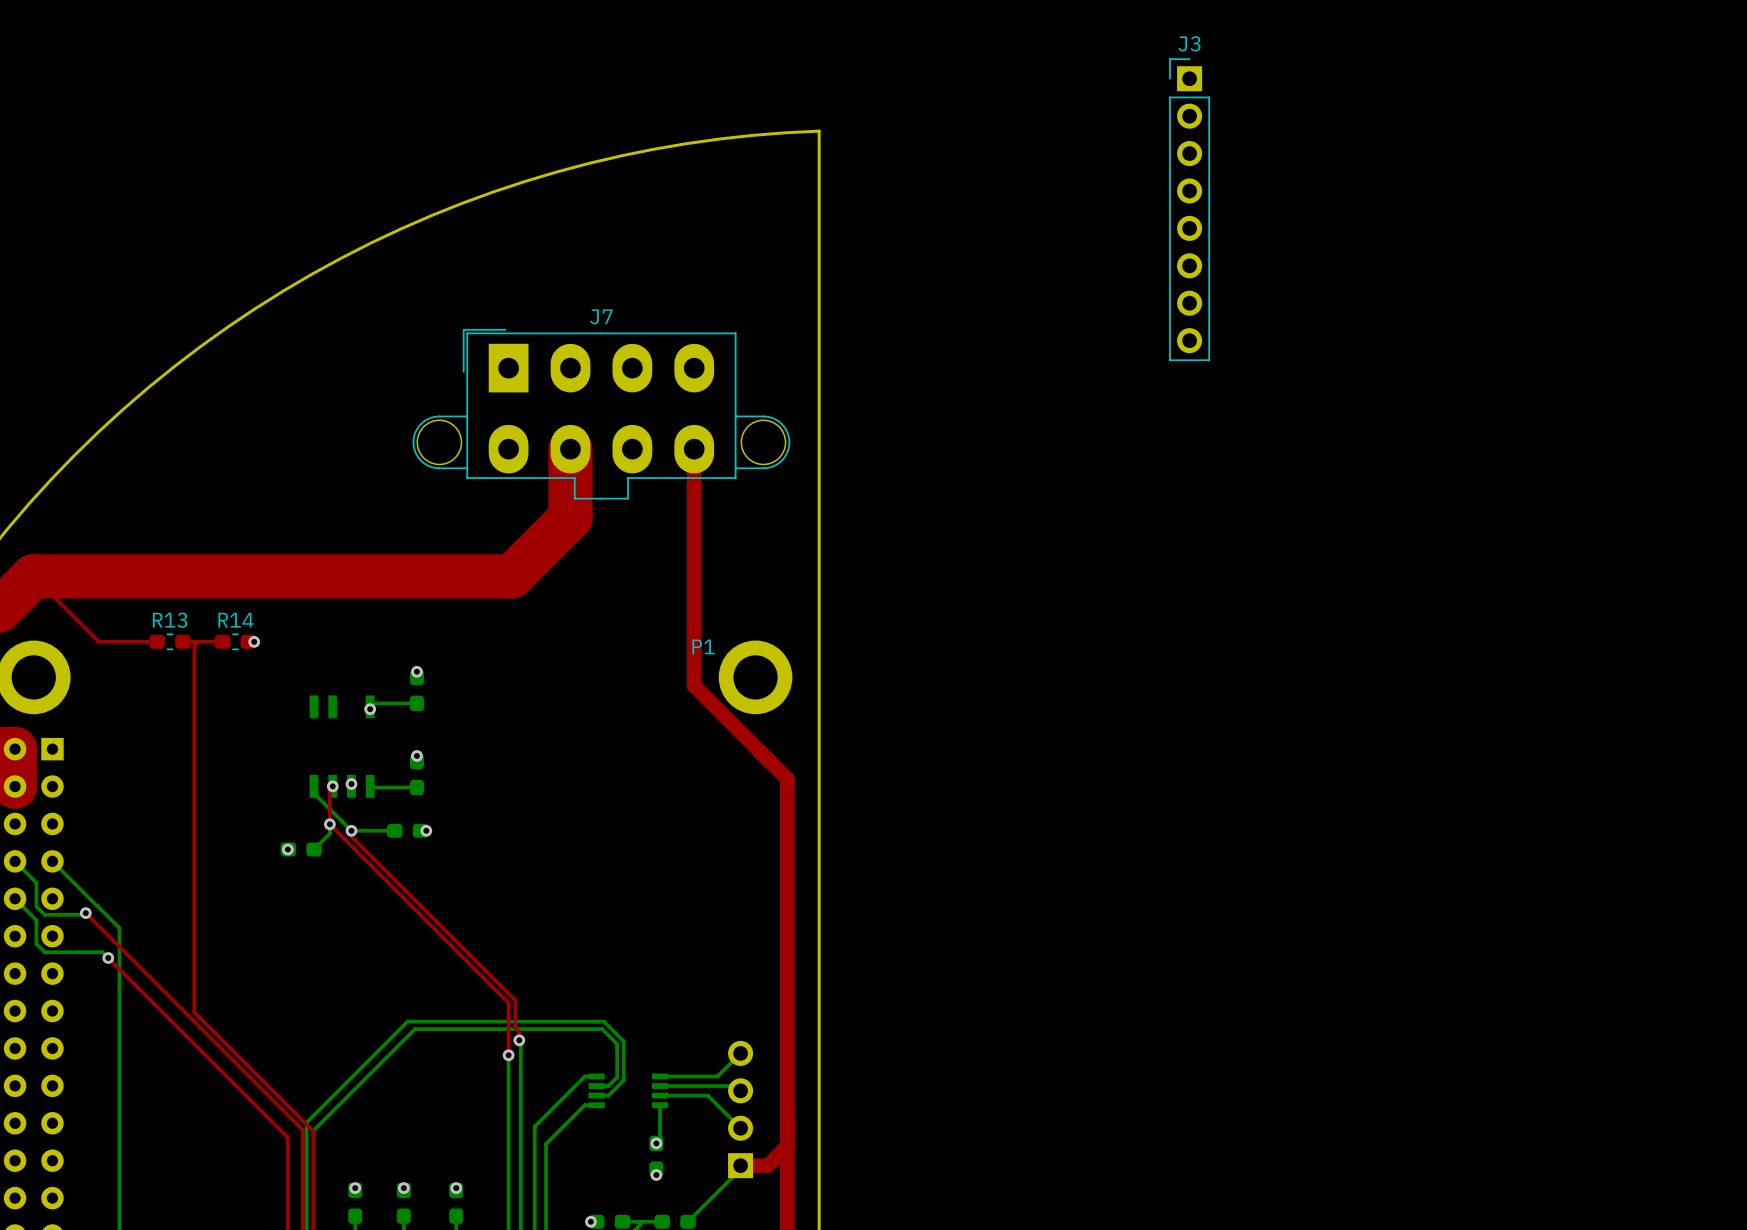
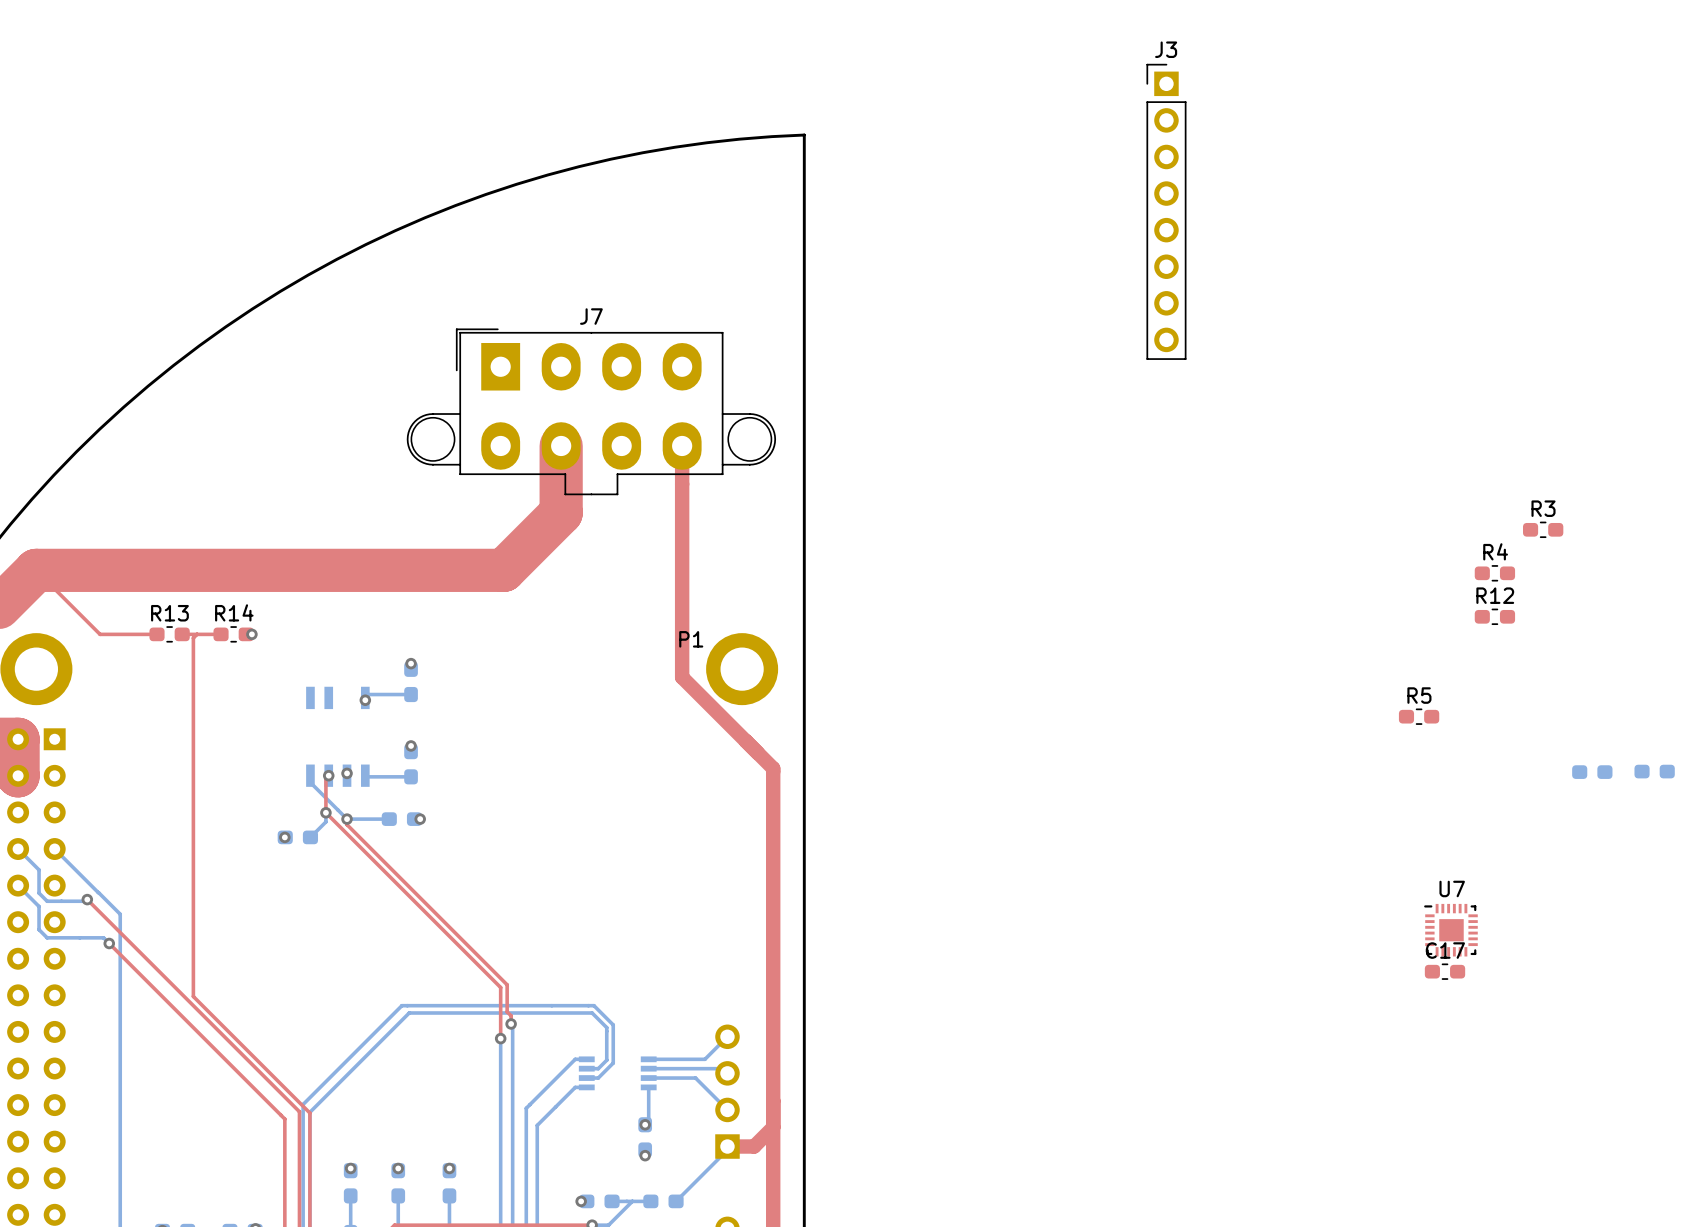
R3: none -> (1543, 529)
R4: none -> (1494, 573)
R12: none -> (1494, 616)
R5: none -> (1419, 716)
part: none -> (1592, 772)
part: none -> (1654, 771)
U7: none -> (1450, 930)
C17: none -> (1445, 971)

